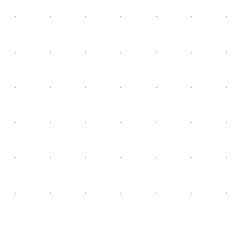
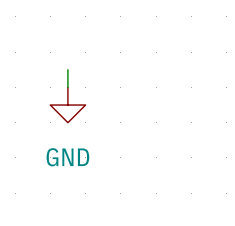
wire: none -> (67, 69) (67, 87)
power symbol: none -> GND (67, 105)

